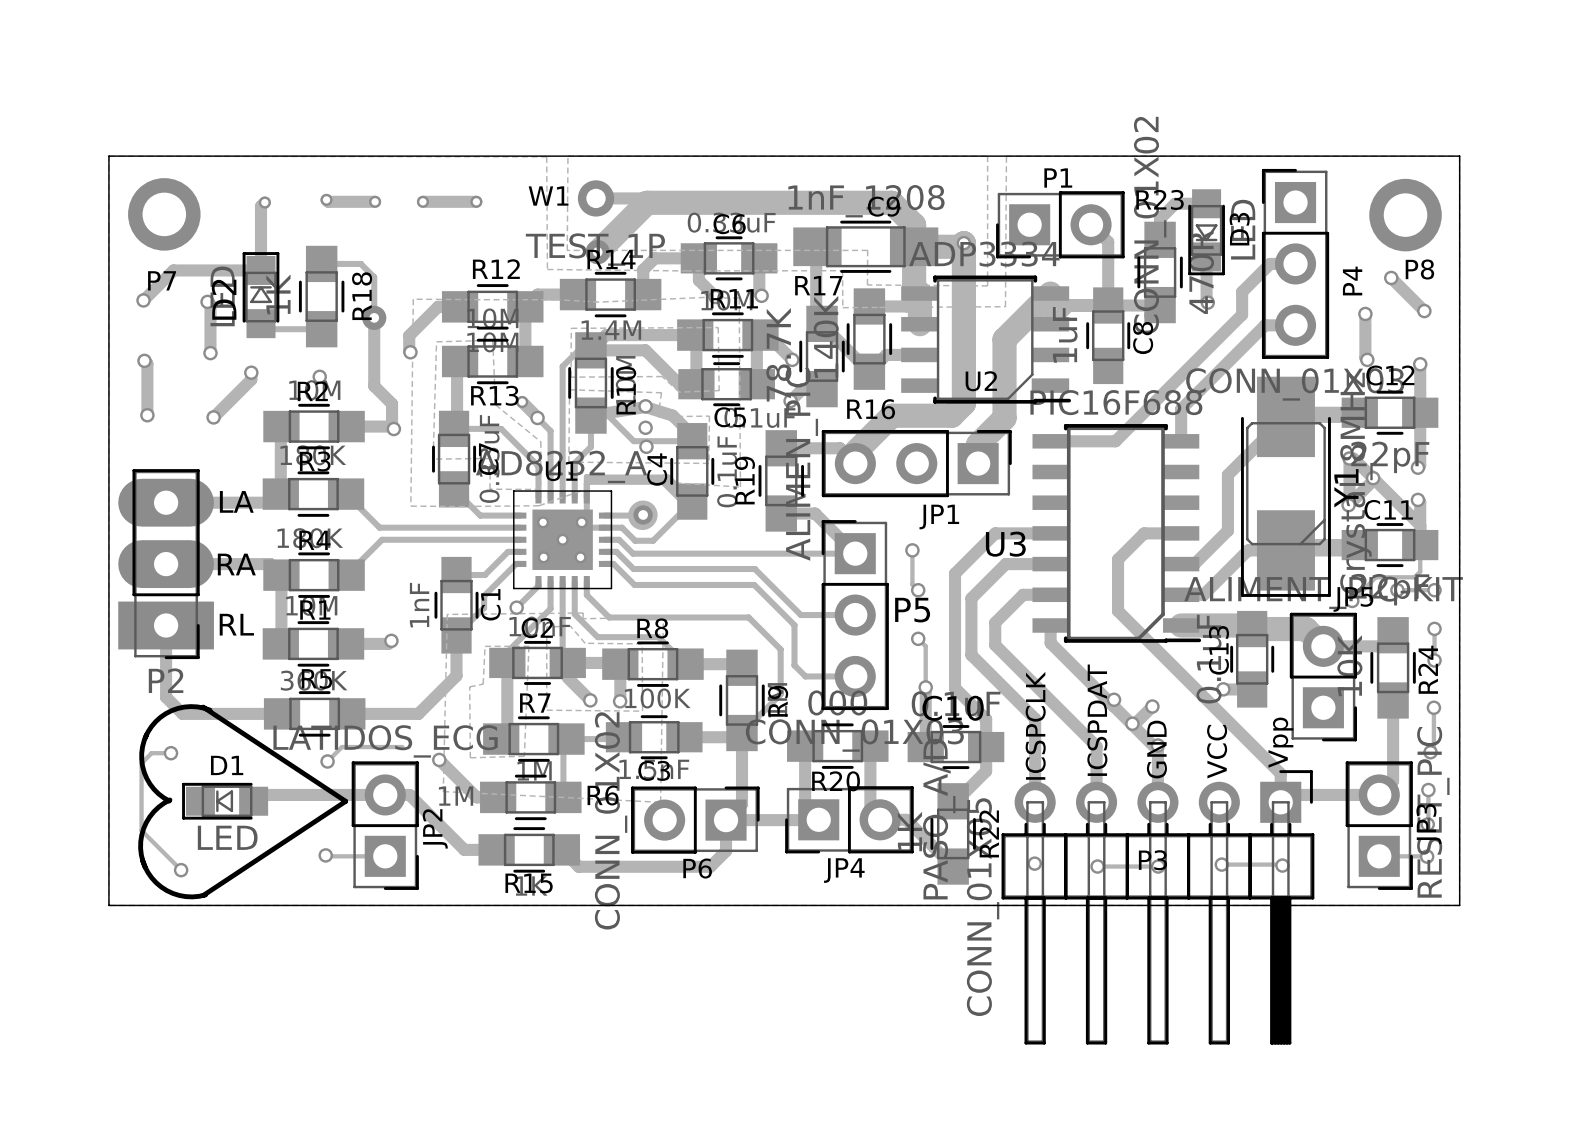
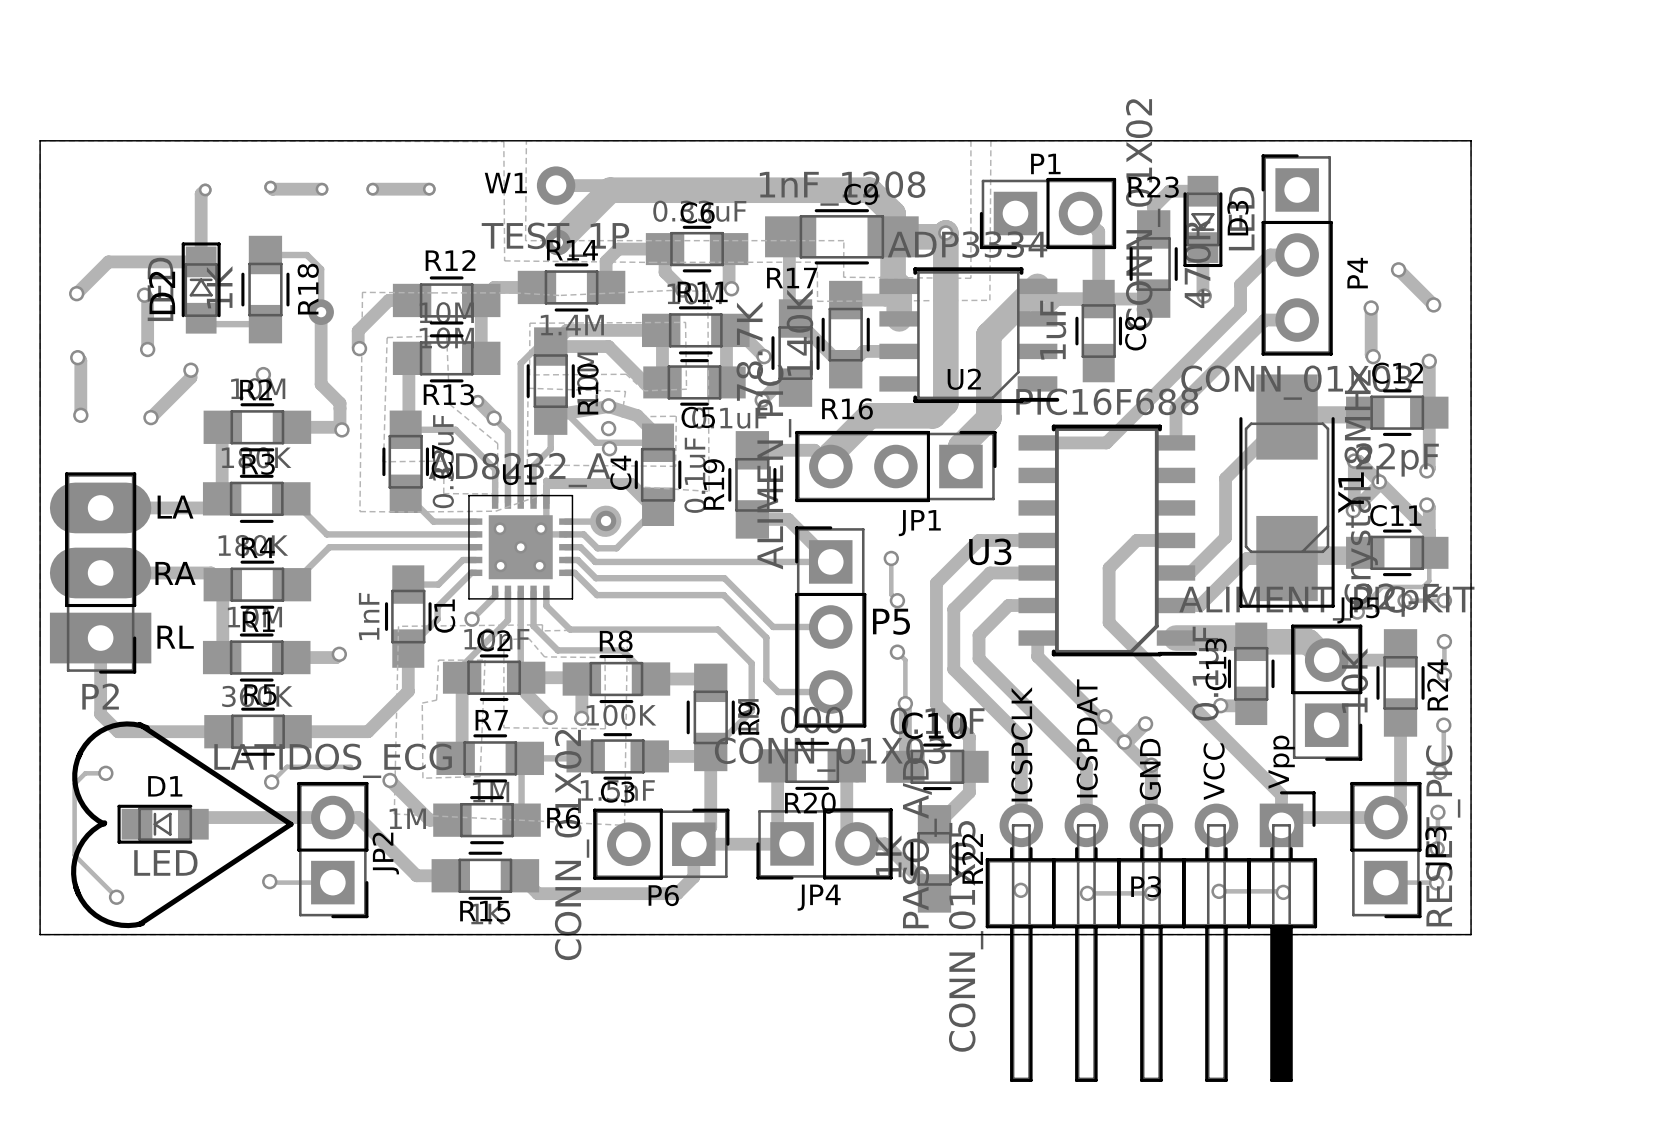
P7: (164, 214) -> none
P8: (1405, 215) -> none

